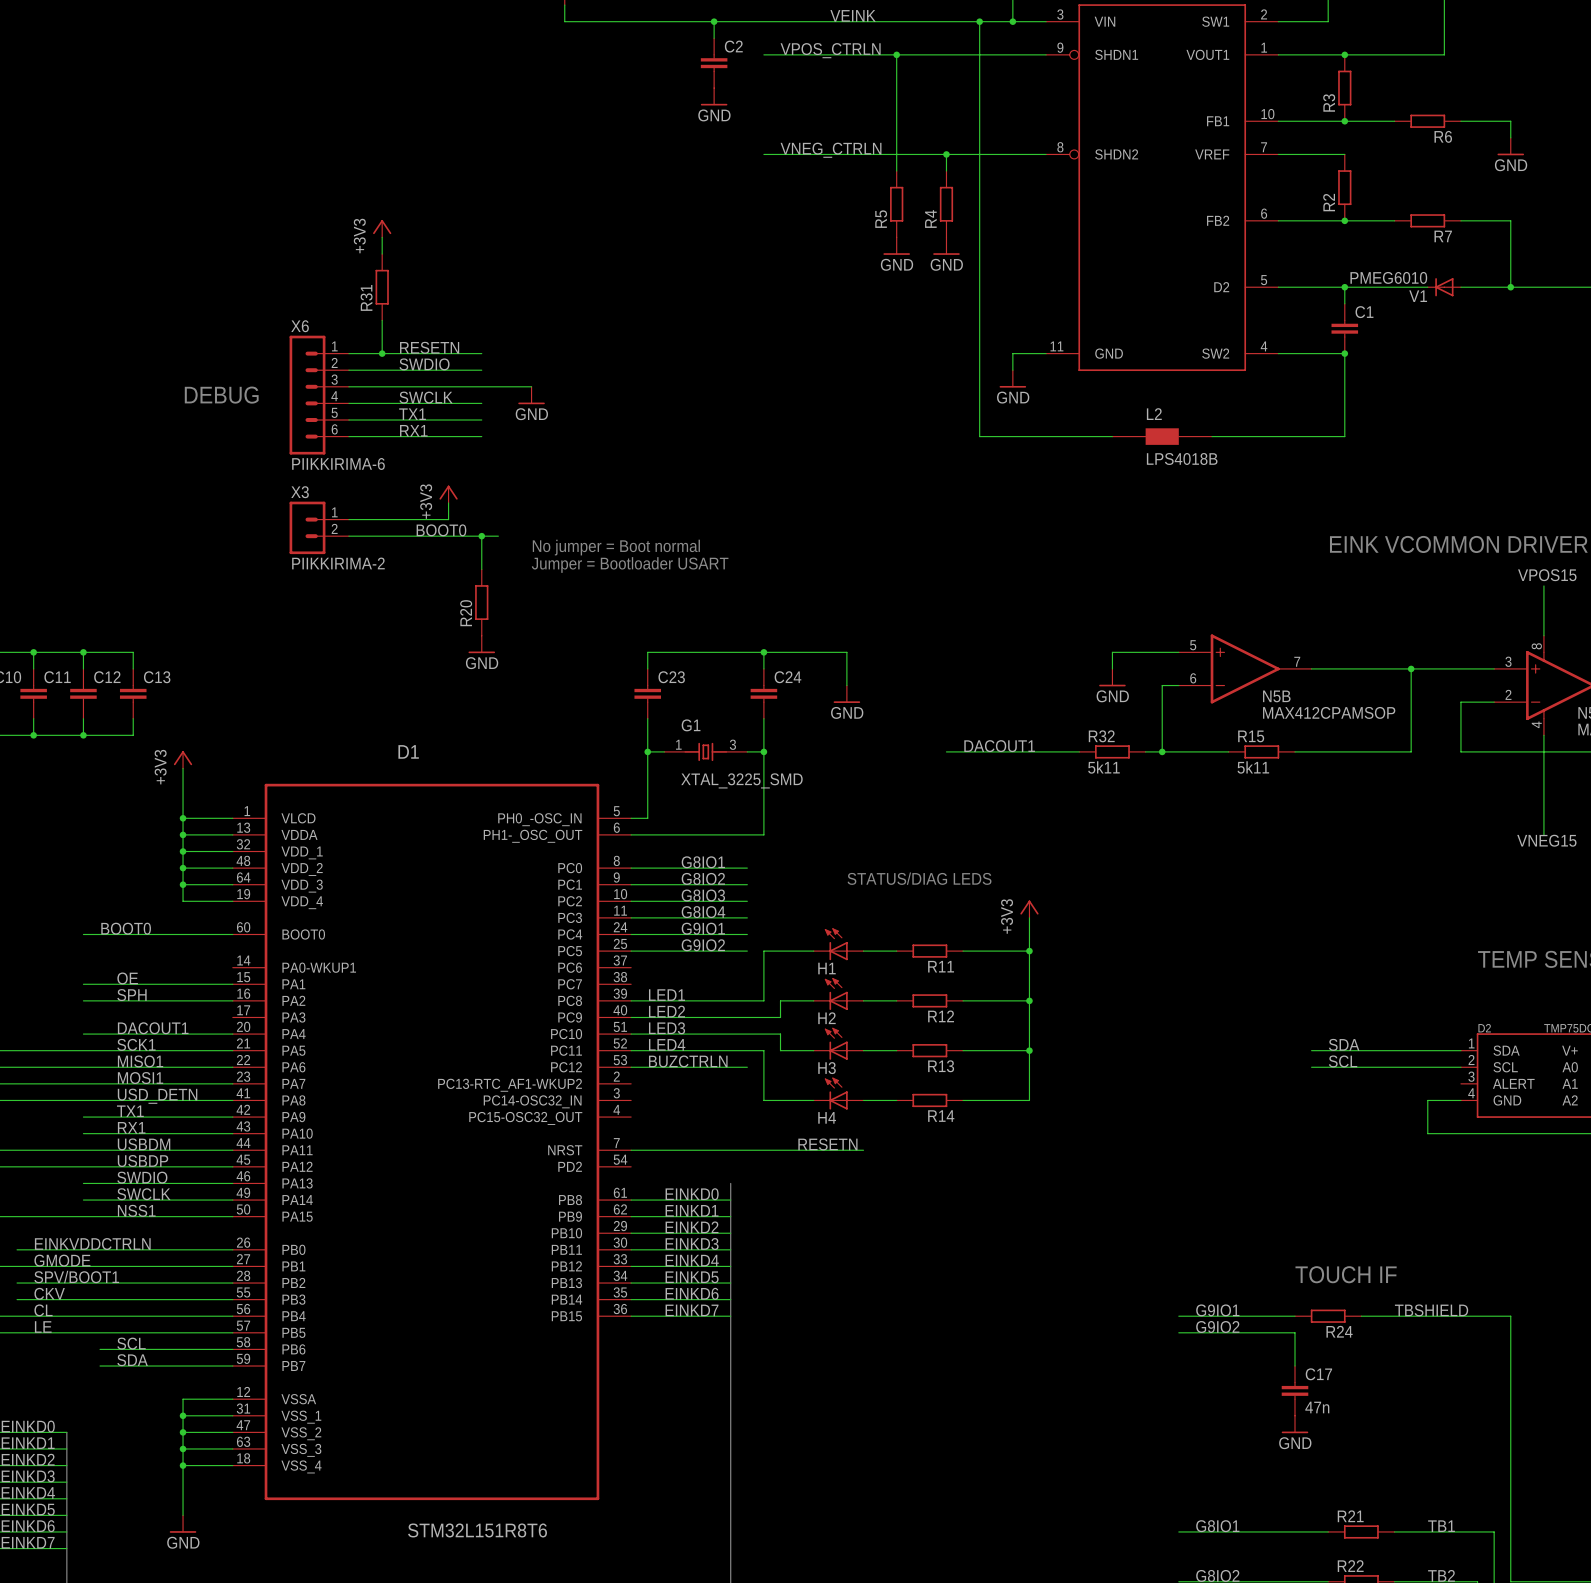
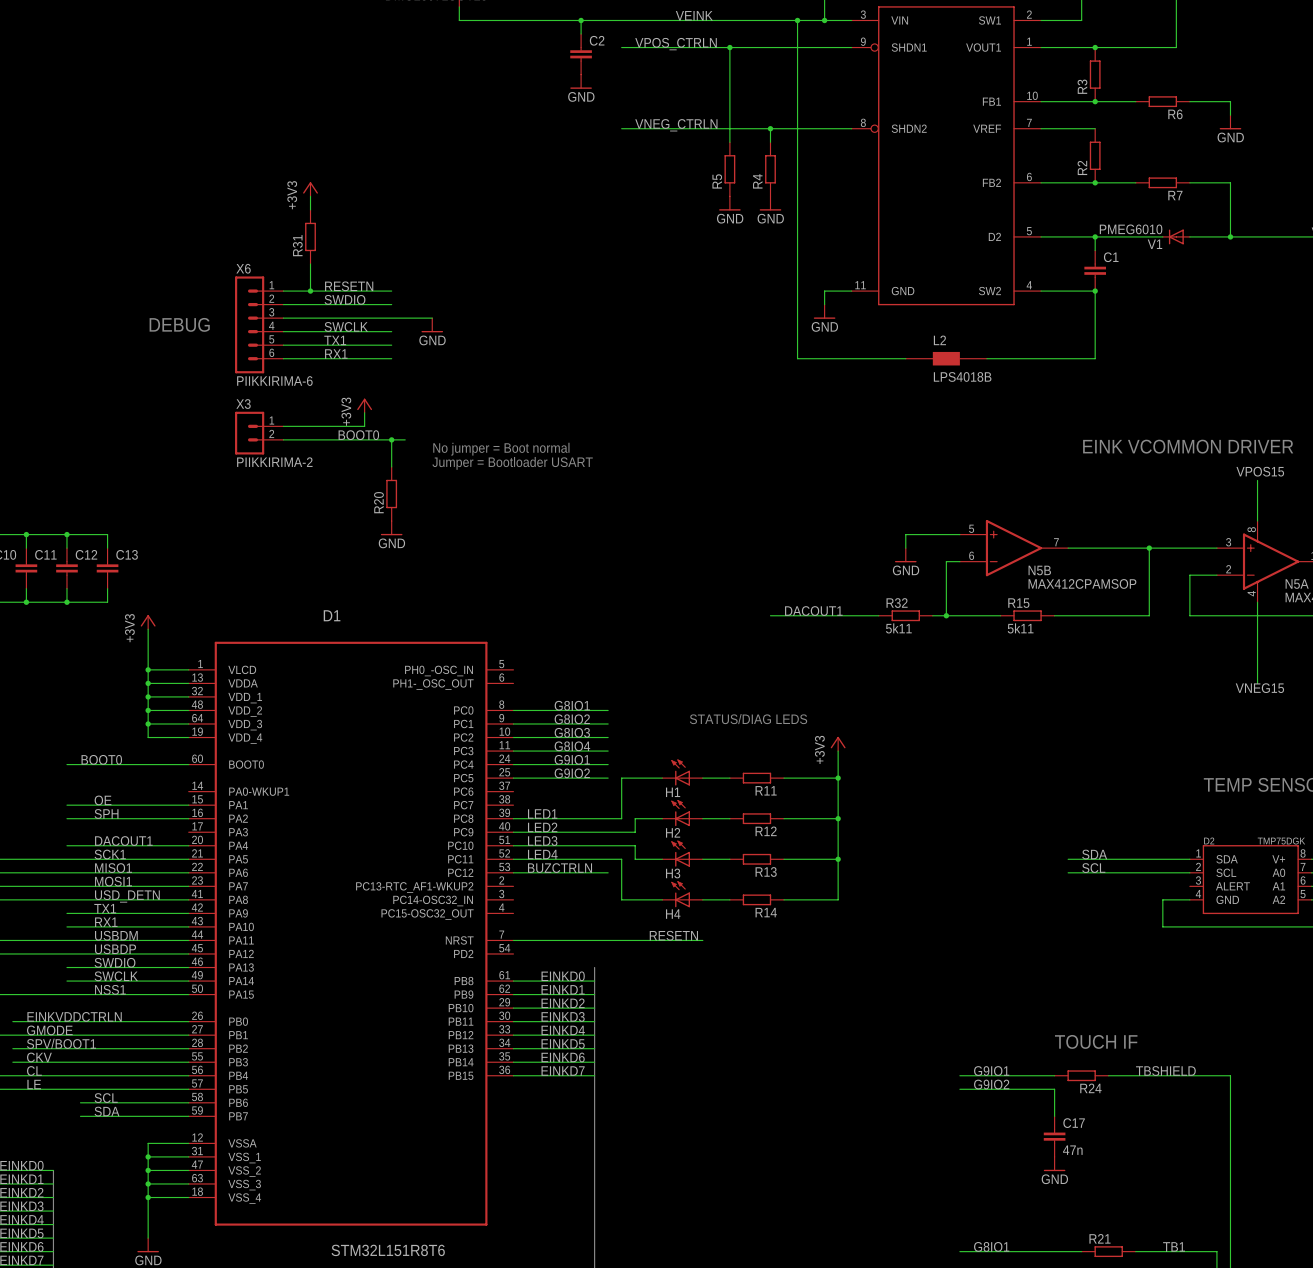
wire: (763, 652) (763, 668) -> none
junction: (763, 652) -> none
wire: (647, 668) (647, 652) (846, 652) (846, 685) -> none
C23: (647, 693) -> none
C24: (763, 693) -> none
power symbol: GND (846, 694) -> none
wire: (647, 718) (647, 818) (631, 818) -> none
wire: (763, 718) (763, 834) (631, 834) -> none
wire: (647, 751) (664, 751) -> none
junction: (647, 751) -> none
G1: XTAL_3225_SMD (705, 751) -> none
wire: (747, 751) (763, 751) -> none
junction: (763, 751) -> none

